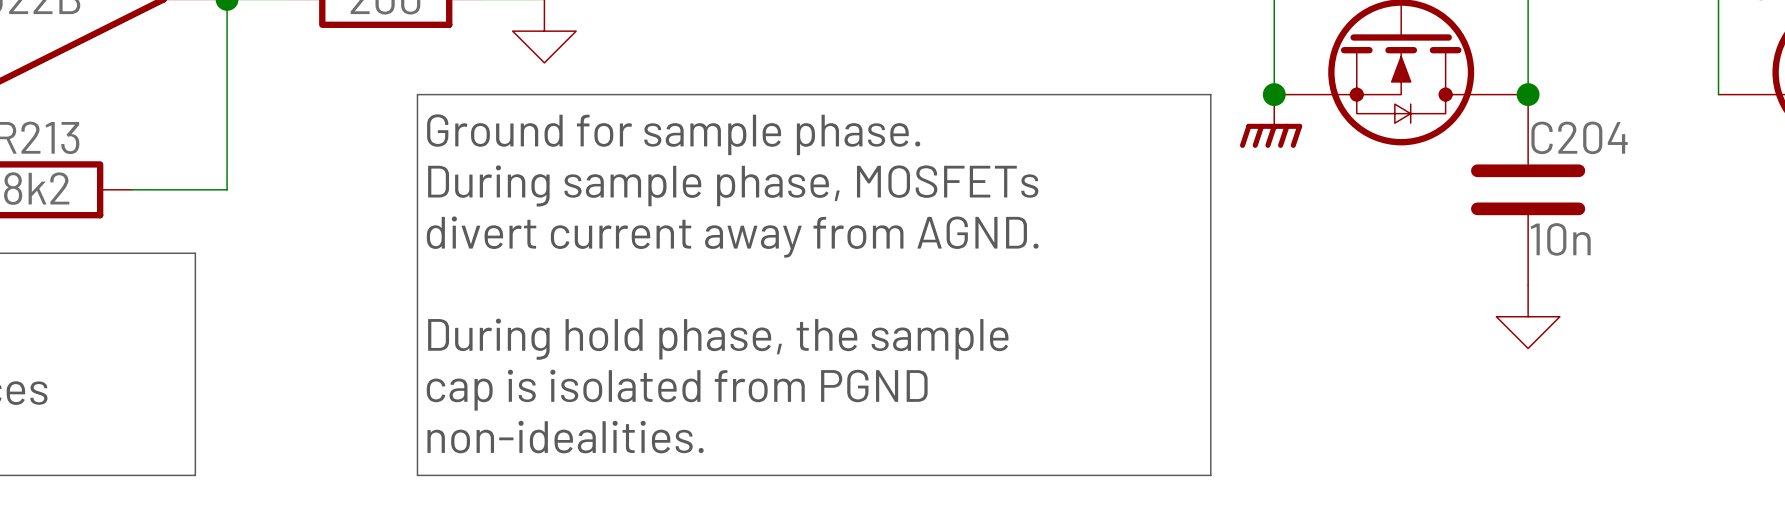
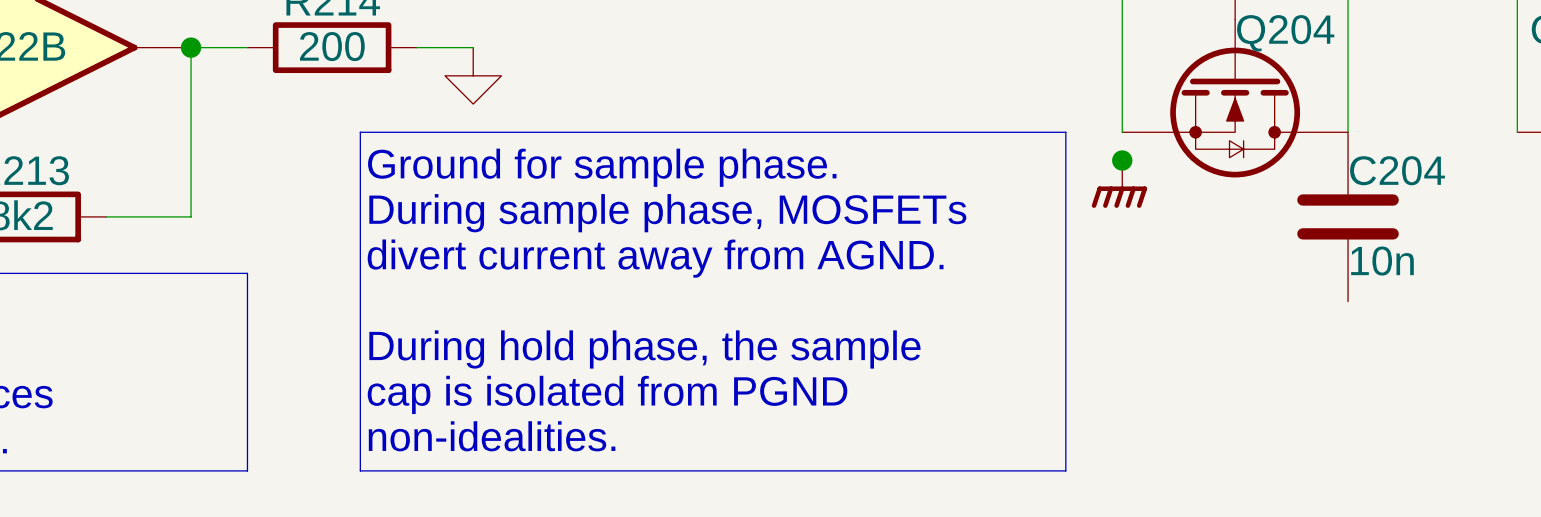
junction position: (1274, 94) -> (1122, 160)
junction: (1528, 94) -> none
power symbol position: (1271, 121) -> (1119, 184)
line: (195, 253) (195, 475) -> (162, 273) (247, 273) (247, 470) (162, 470)
power symbol: (1528, 316) -> none

